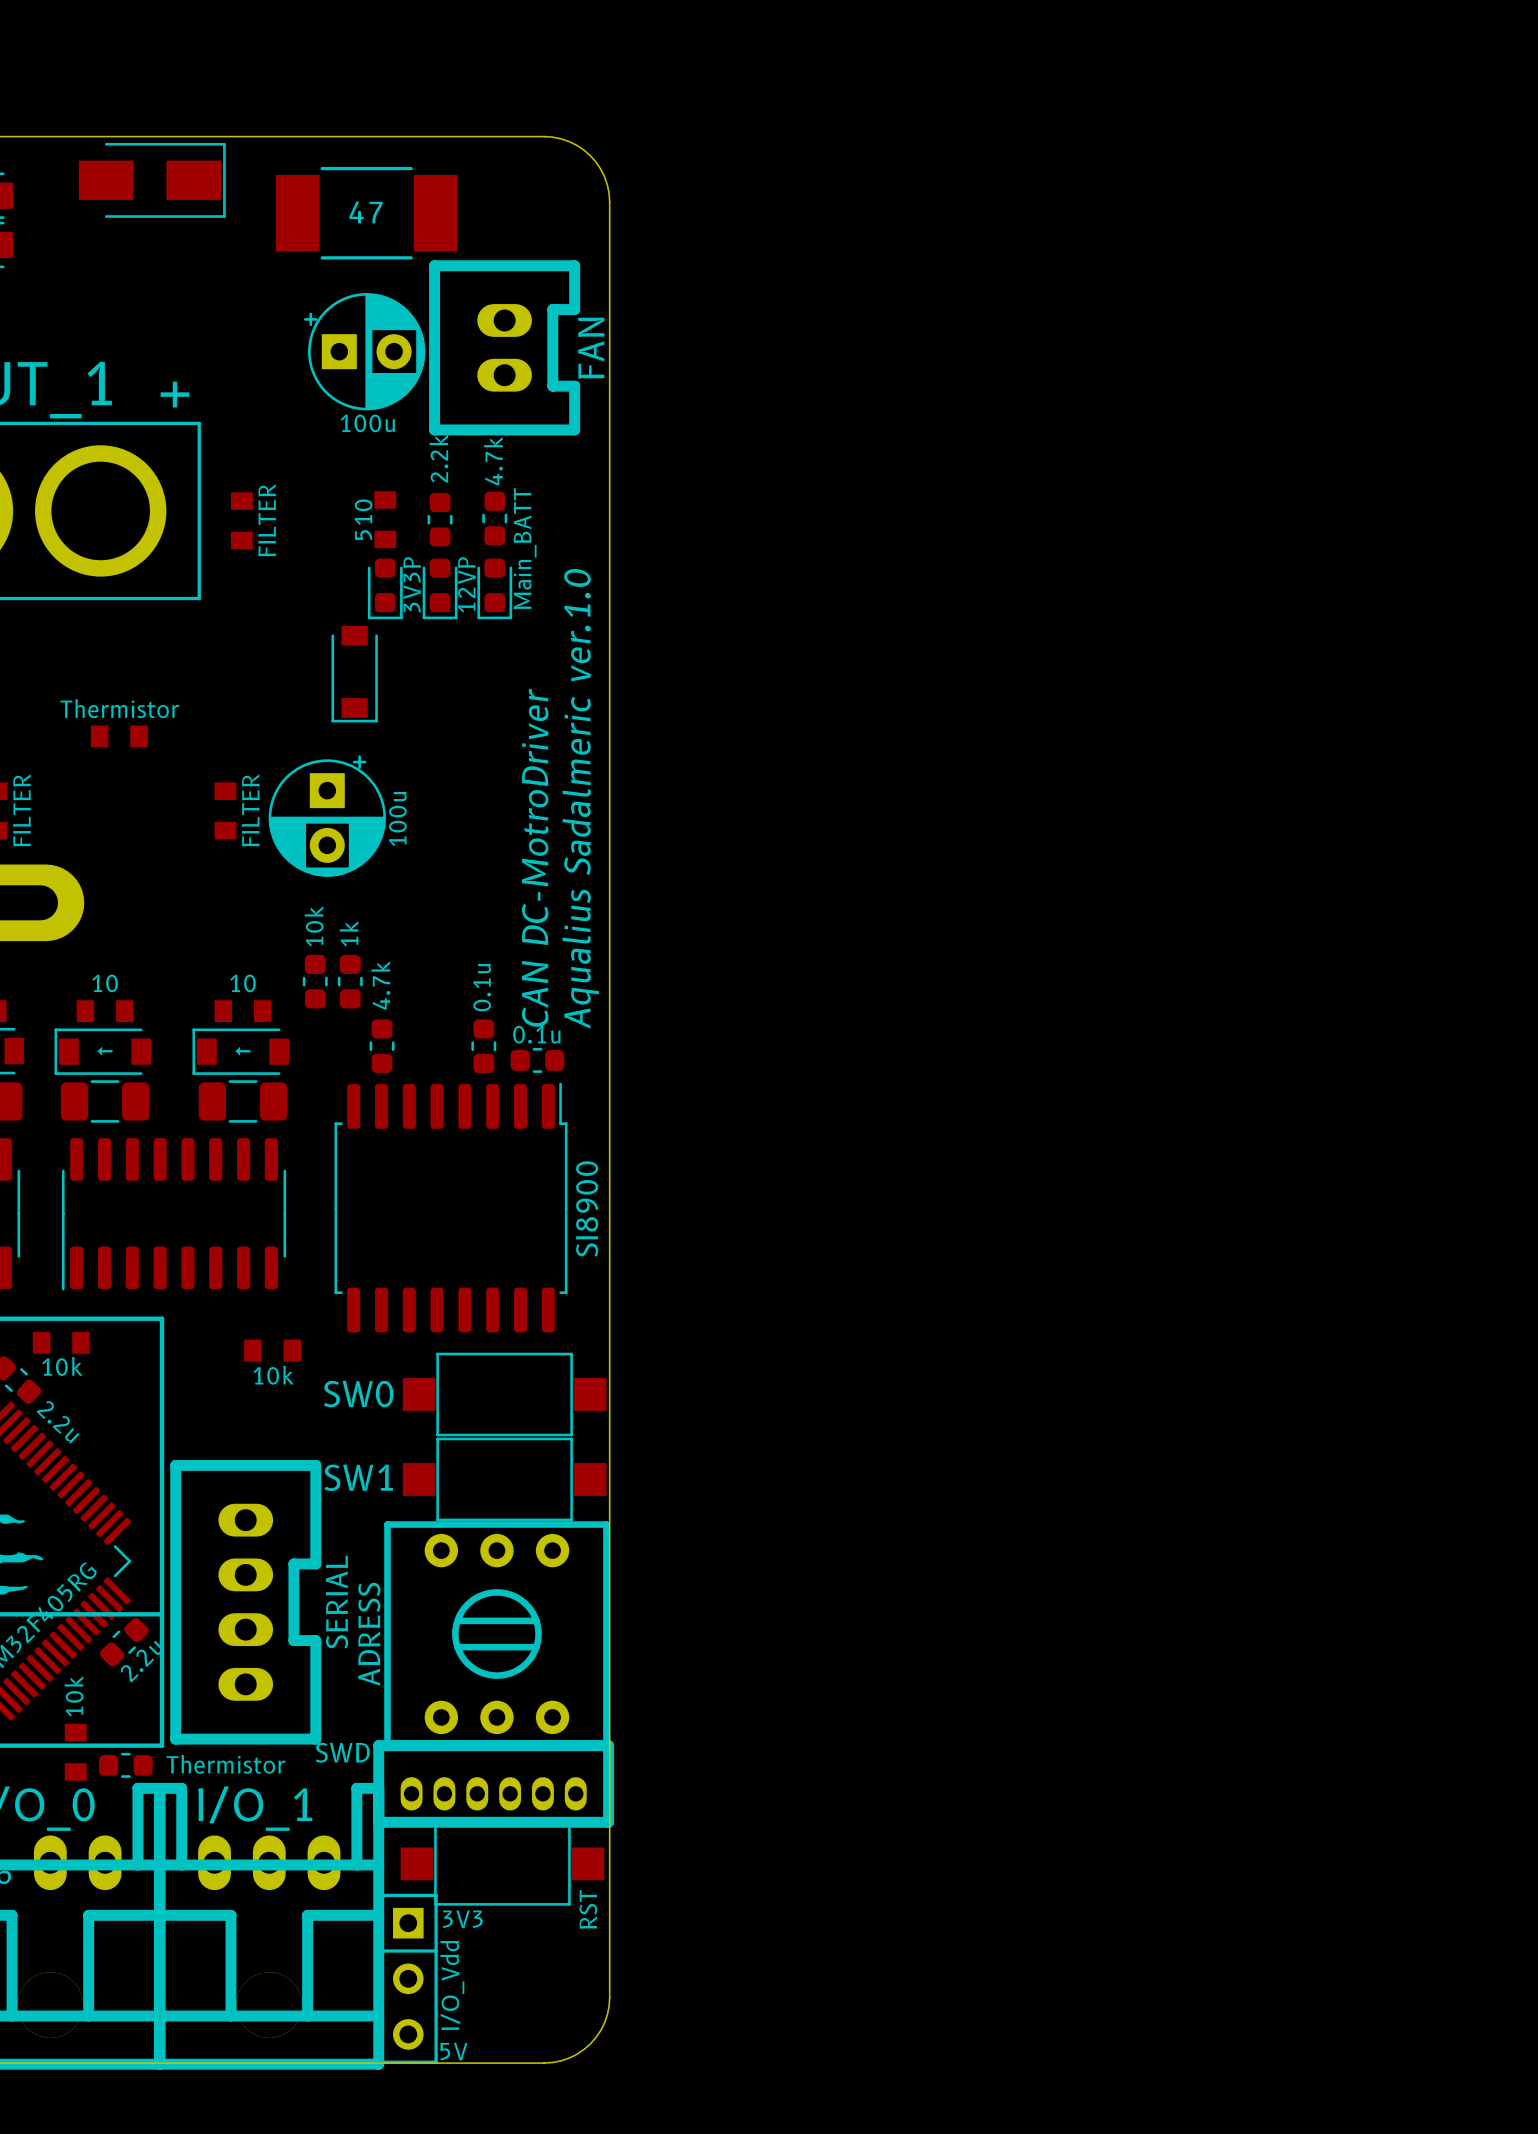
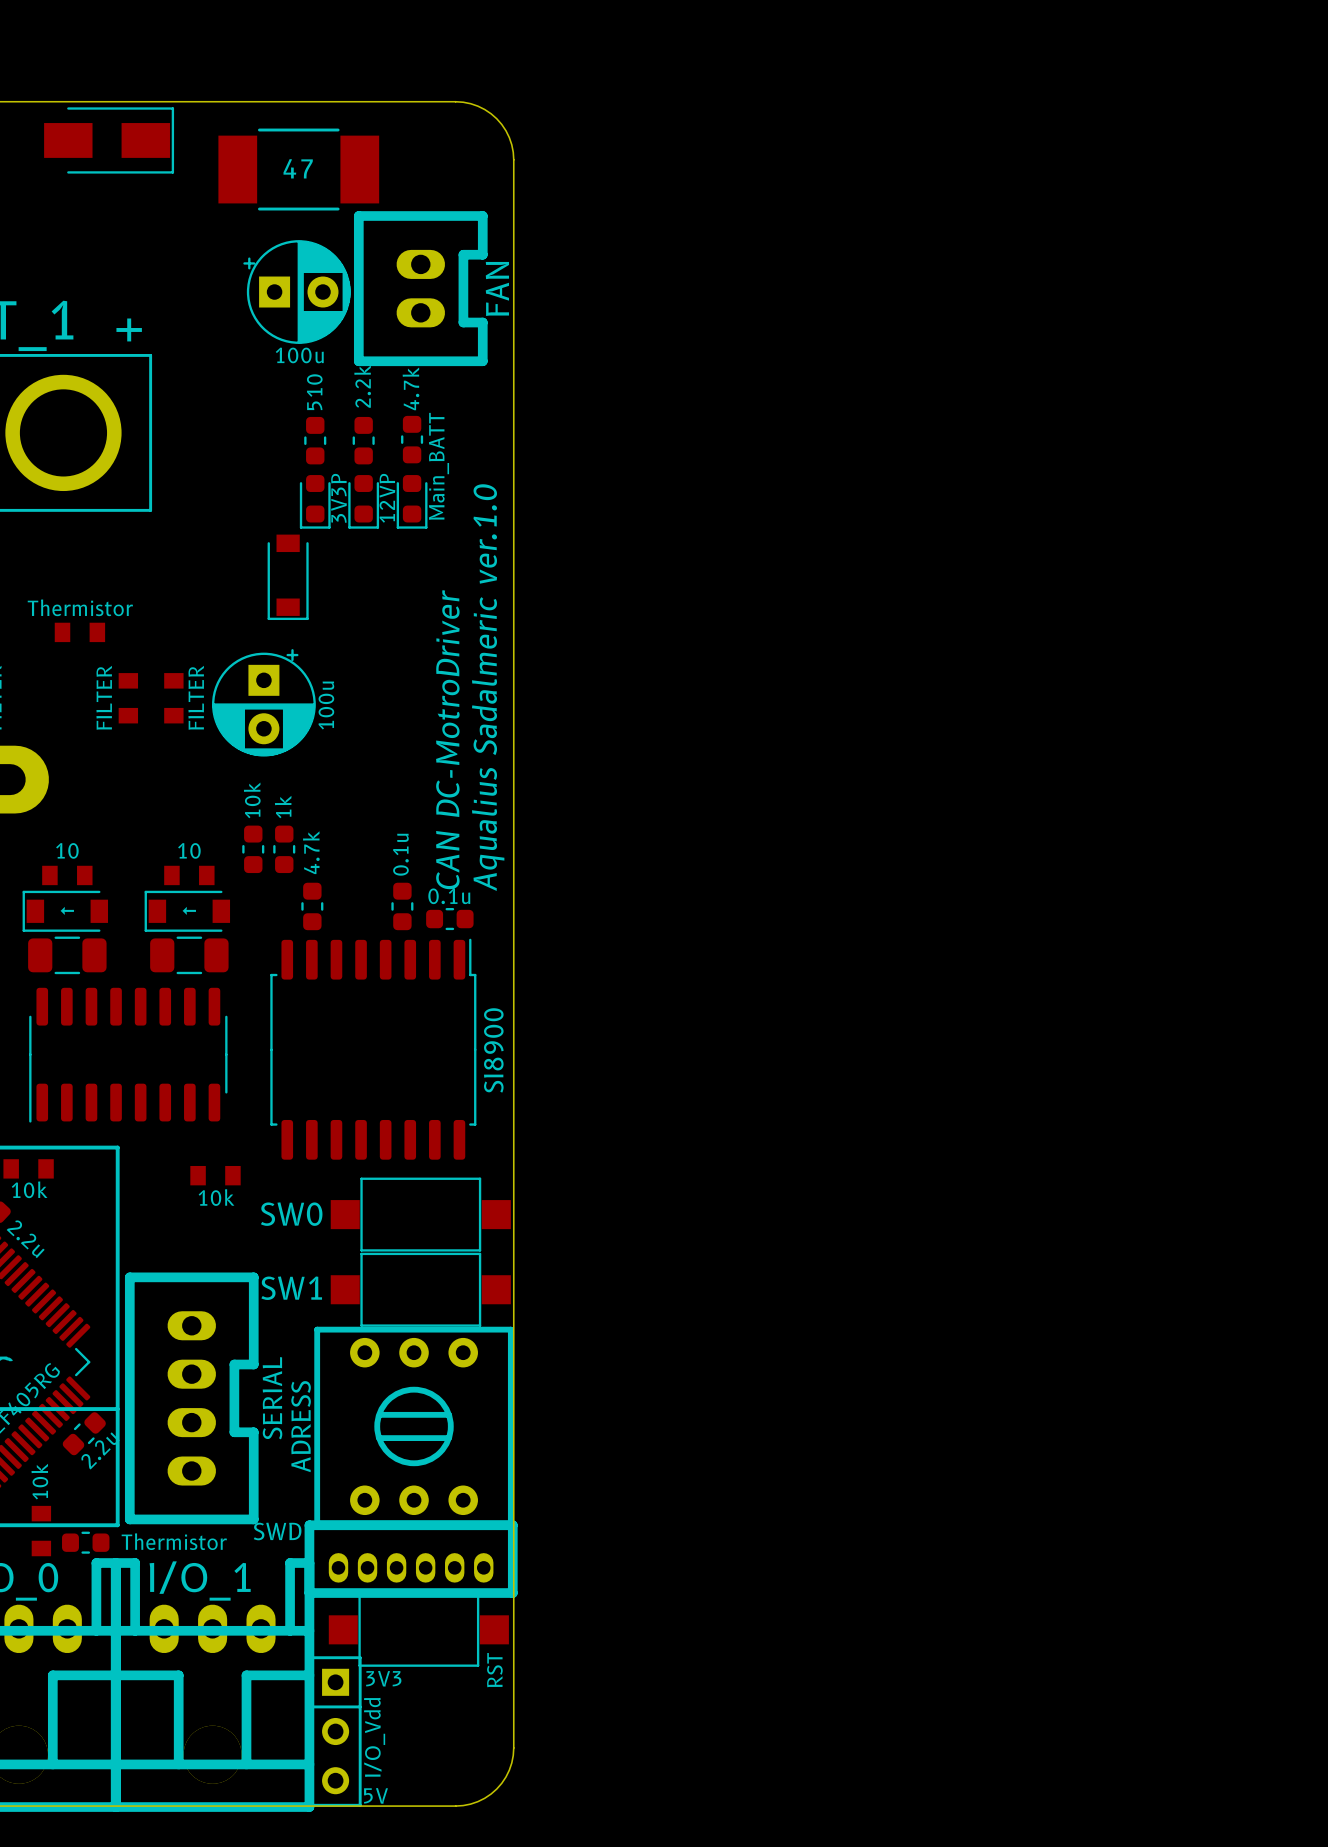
part footprint: [374, 491, 397, 549] -> [304, 416, 327, 465]
part value position: 510 (363, 519) -> 510 (314, 392)
part position: (241, 520) -> (128, 698)
part value position: FILTER (267, 520) -> FILTER (104, 697)

